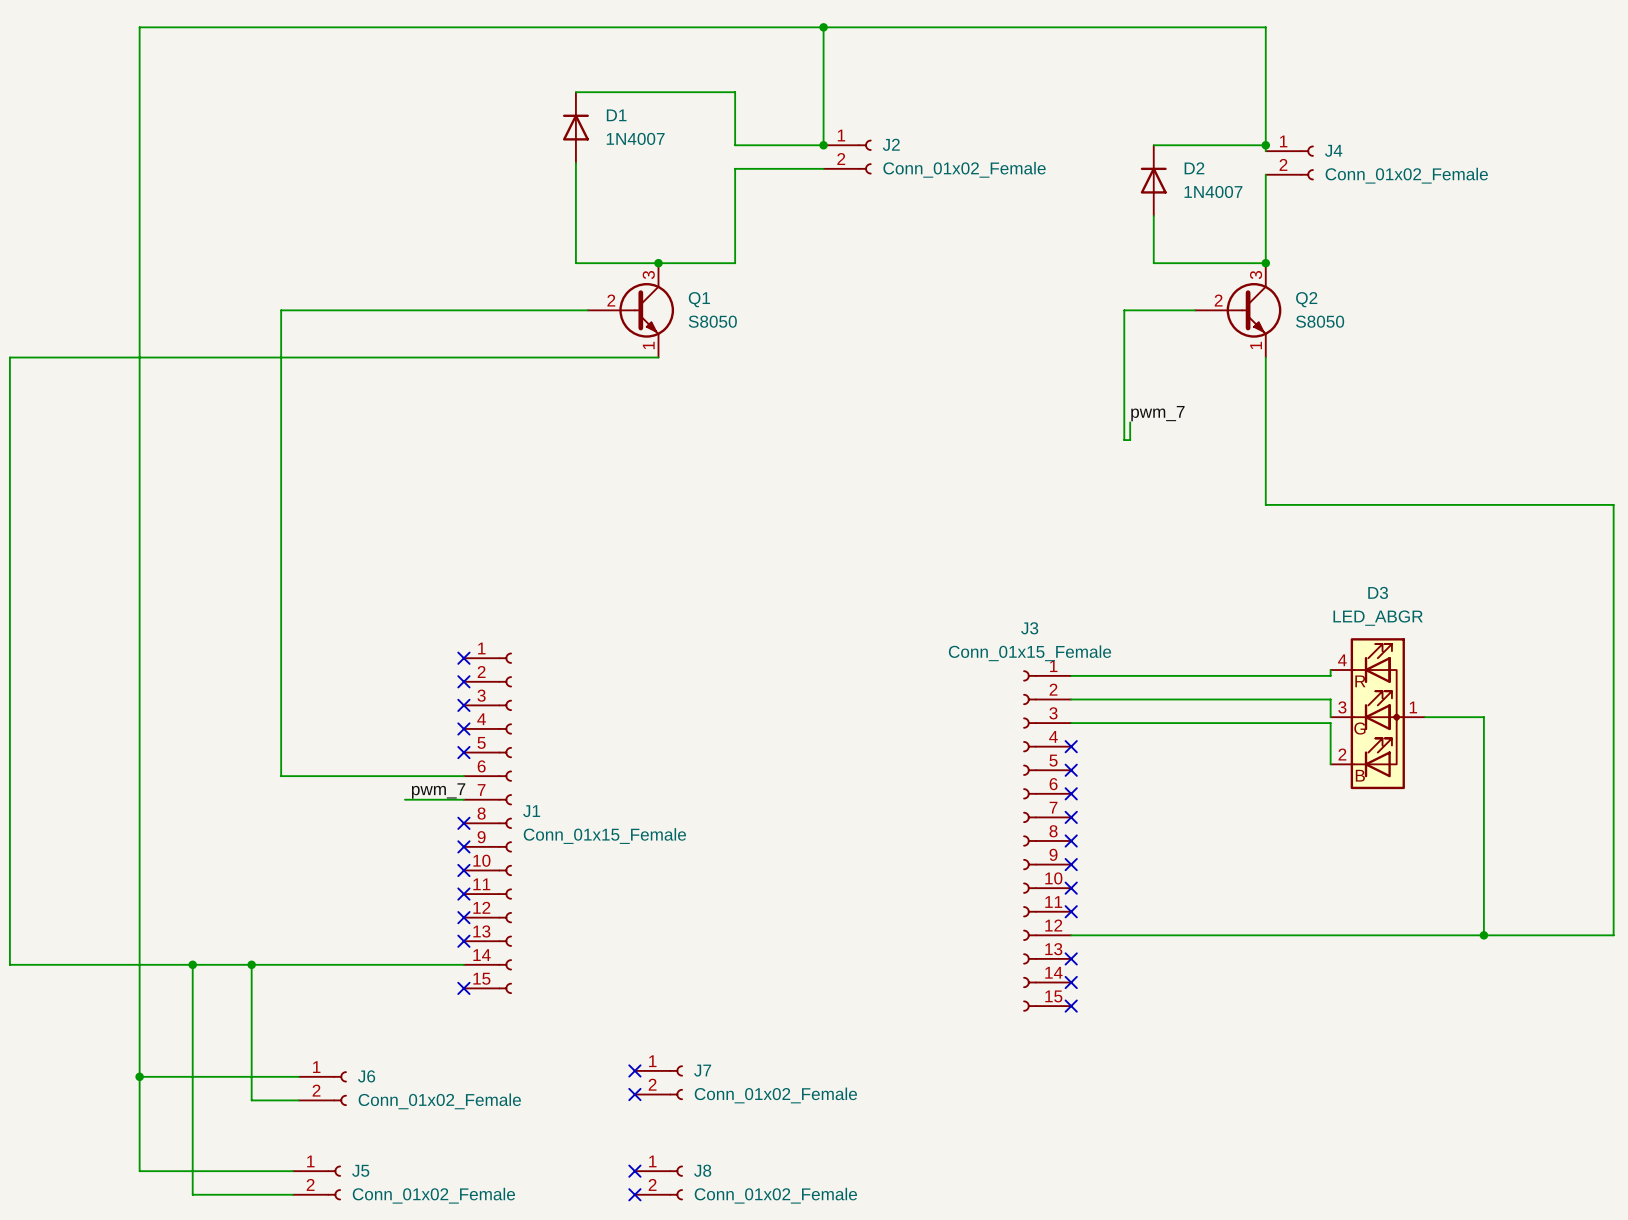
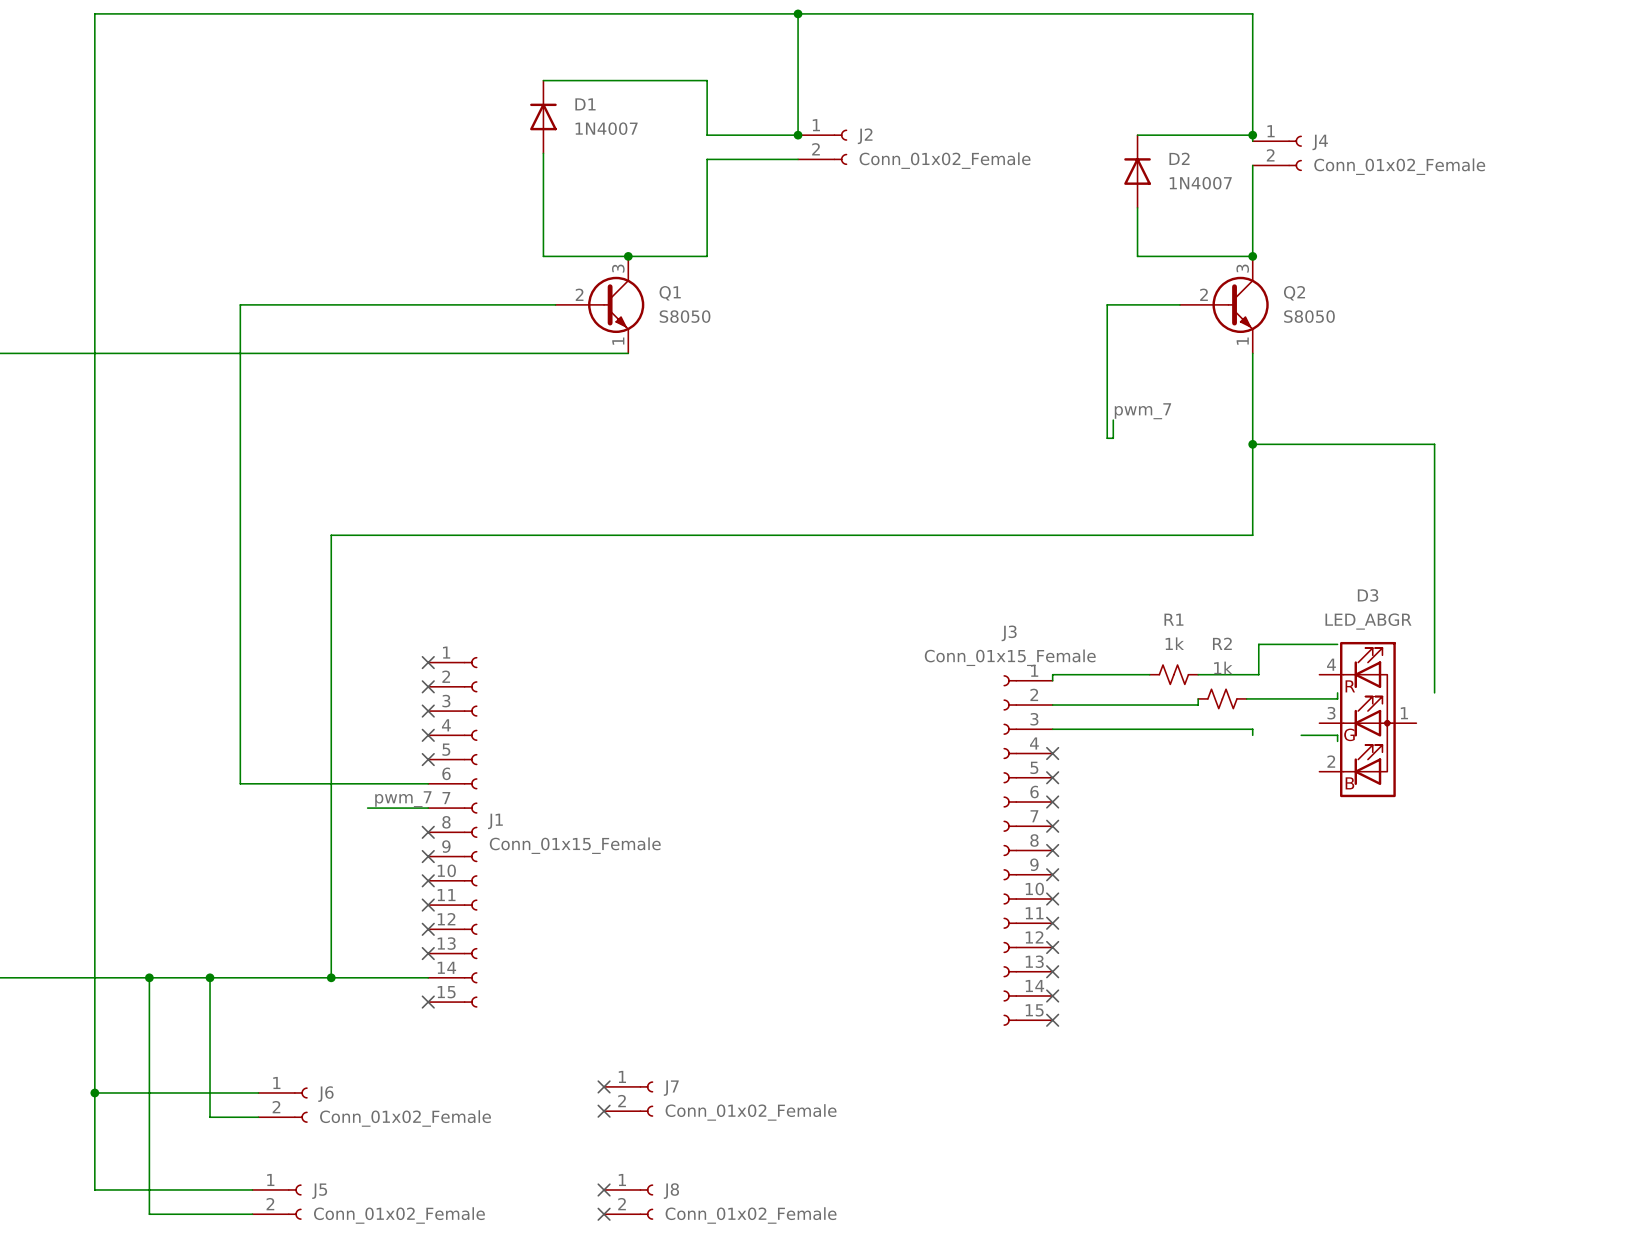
wire: none -> (1252, 444) (1434, 444) (1434, 692)
junction: none -> (1252, 444)
wire: (1265, 504) (1613, 504) (1613, 935) (1071, 935) -> (1252, 504) (1252, 535) (331, 535) (331, 977)
wire: none -> (1337, 644) (1258, 644) (1258, 674) (1198, 674)
R1: none -> 1k (1173, 674)
wire: (1330, 670) (1330, 675) (1071, 675) -> (1149, 674) (1052, 674) (1052, 680)
wire: none -> (1337, 692) (1337, 698) (1246, 698)
R2: none -> 1k (1222, 698)
wire: (1212, 699) (1330, 699) (1330, 717) -> (1198, 705) (1198, 698)
wire: (1424, 717) (1483, 717) (1483, 935) -> none
wire: (1265, 723) (1330, 723) (1330, 764) -> (1252, 729) (1252, 735)
wire: none -> (1301, 735) (1337, 735) (1337, 741)
no-connect mark: none -> (1052, 947)
junction: (1483, 935) -> none
junction: none -> (331, 977)

